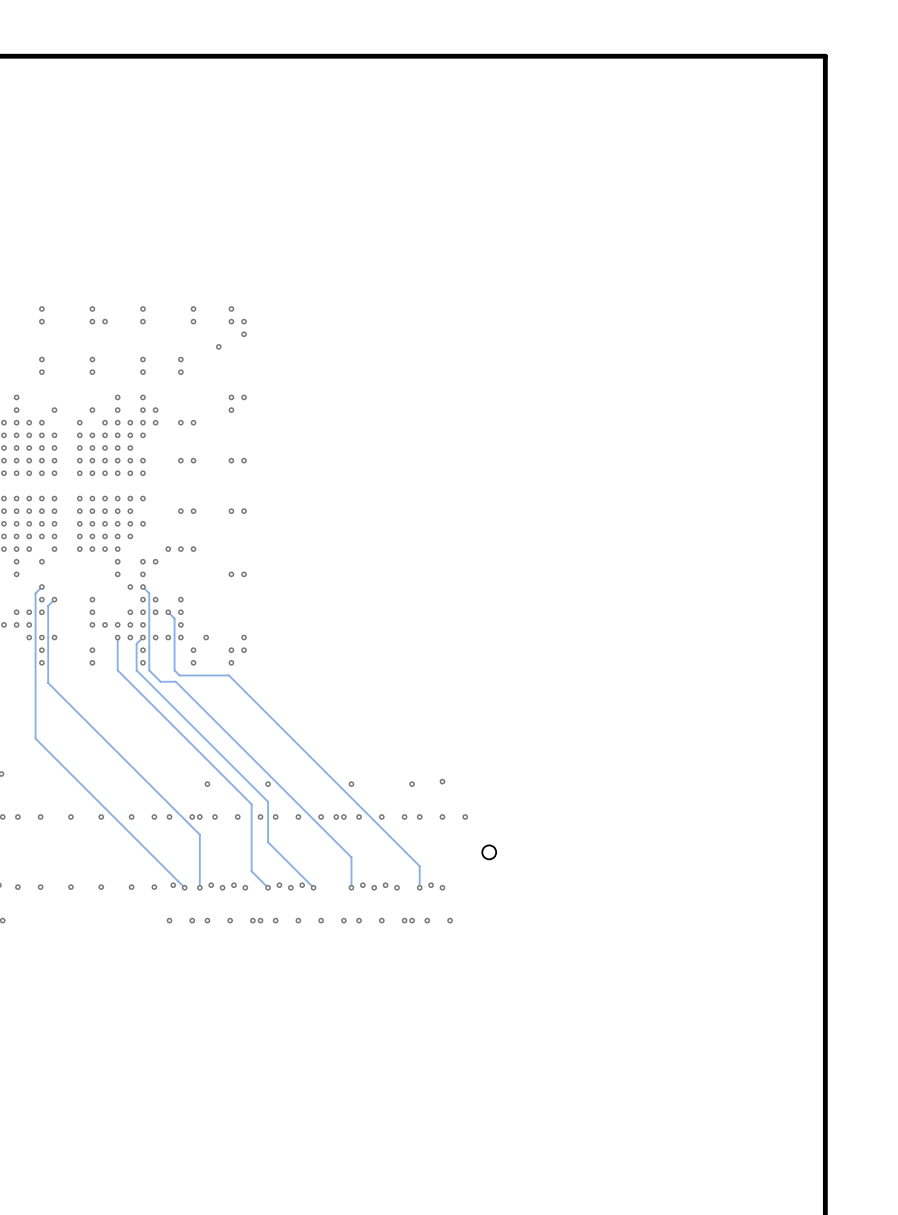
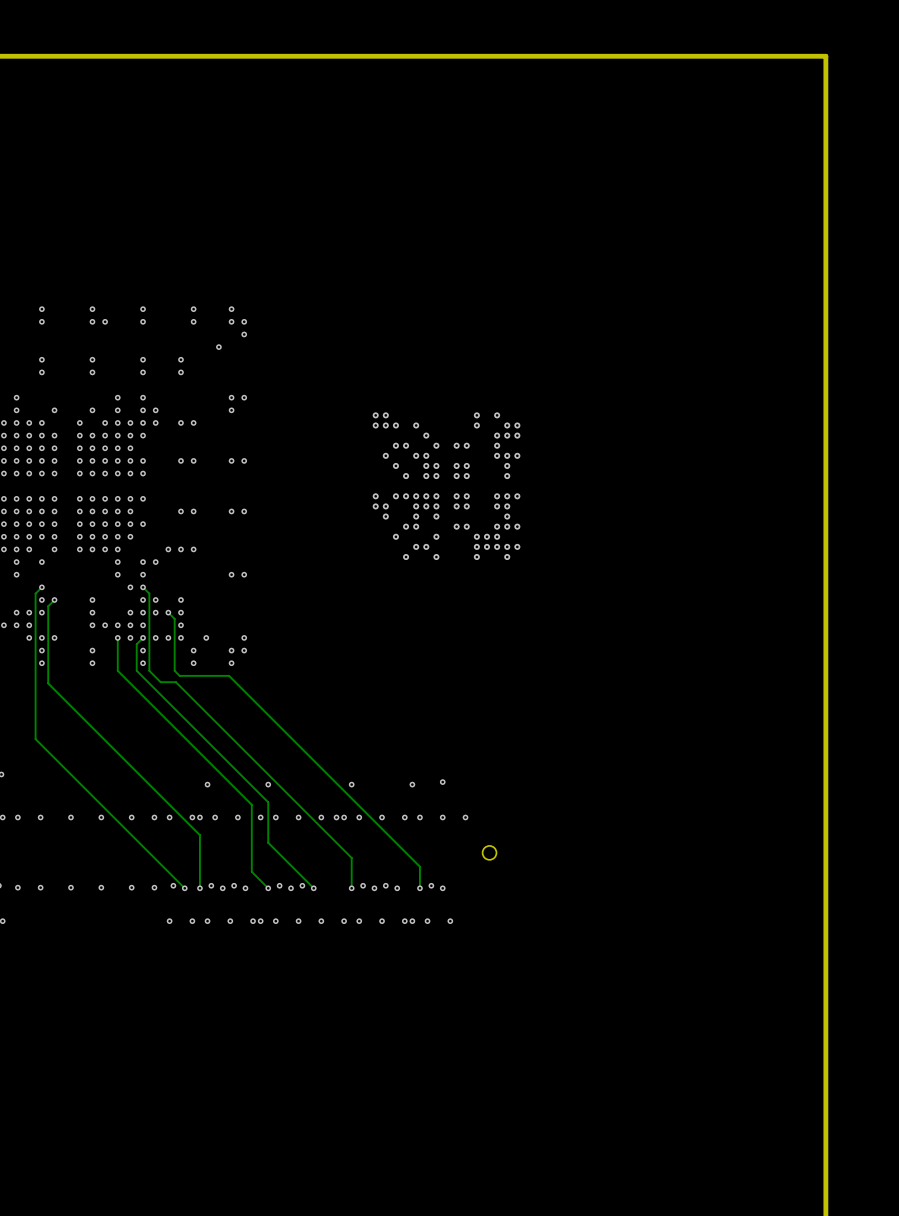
via: none -> (375, 415)
via: none -> (385, 415)
via: none -> (476, 415)
via: none -> (497, 415)
via: none -> (375, 425)
via: none -> (385, 425)
via: none -> (395, 425)
via: none -> (416, 425)
via: none -> (476, 425)
via: none -> (507, 425)
via: none -> (517, 425)
via: none -> (426, 435)
via: none -> (497, 435)
via: none -> (507, 435)
via: none -> (517, 435)
via: none -> (395, 445)
via: none -> (406, 445)
via: none -> (436, 445)
via: none -> (456, 445)
via: none -> (466, 445)
via: none -> (497, 445)
via: none -> (385, 455)
via: none -> (416, 455)
via: none -> (426, 455)
via: none -> (497, 455)
via: none -> (507, 455)
via: none -> (517, 455)
via: none -> (395, 465)
via: none -> (426, 465)
via: none -> (436, 465)
via: none -> (456, 465)
via: none -> (466, 465)
via: none -> (507, 465)
via: none -> (406, 476)
via: none -> (426, 476)
via: none -> (436, 476)
via: none -> (456, 476)
via: none -> (466, 476)
via: none -> (507, 476)
via: none -> (375, 496)
via: none -> (395, 496)
via: none -> (406, 496)
via: none -> (416, 496)
via: none -> (426, 496)
via: none -> (436, 496)
via: none -> (456, 496)
via: none -> (466, 496)
via: none -> (497, 496)
via: none -> (507, 496)
via: none -> (517, 496)
via: none -> (375, 506)
via: none -> (385, 506)
via: none -> (416, 506)
via: none -> (426, 506)
via: none -> (436, 506)
via: none -> (456, 506)
via: none -> (466, 506)
via: none -> (497, 506)
via: none -> (507, 506)
via: none -> (385, 516)
via: none -> (416, 516)
via: none -> (436, 516)
via: none -> (507, 516)
via: none -> (406, 526)
via: none -> (416, 526)
via: none -> (456, 526)
via: none -> (466, 526)
via: none -> (497, 526)
via: none -> (507, 526)
via: none -> (517, 526)
via: none -> (395, 536)
via: none -> (436, 536)
via: none -> (476, 536)
via: none -> (486, 536)
via: none -> (497, 536)
via: none -> (416, 546)
via: none -> (426, 546)
via: none -> (476, 546)
via: none -> (486, 546)
via: none -> (497, 546)
via: none -> (507, 546)
via: none -> (517, 546)
via: none -> (406, 557)
via: none -> (436, 557)
via: none -> (476, 557)
via: none -> (507, 557)

